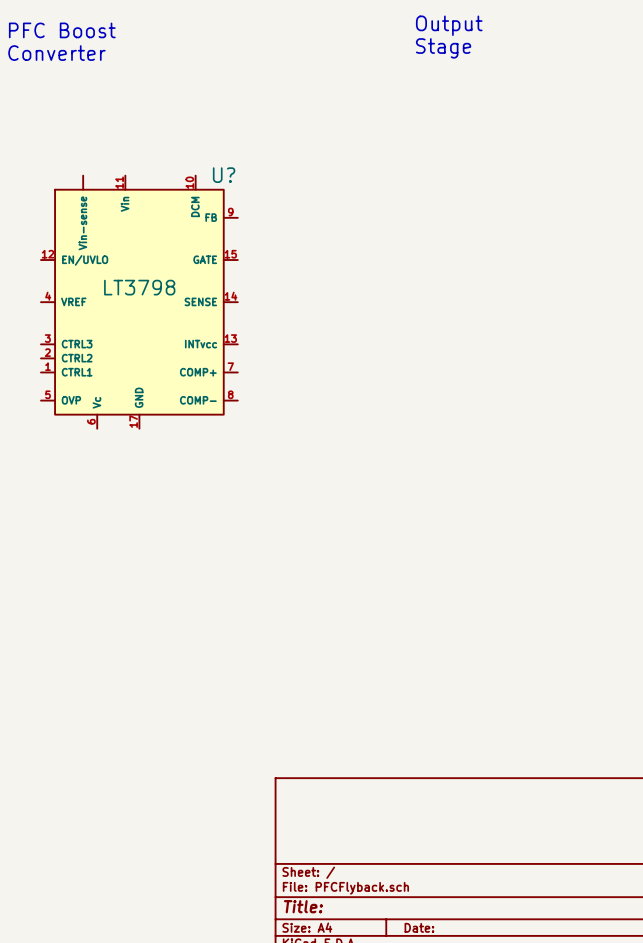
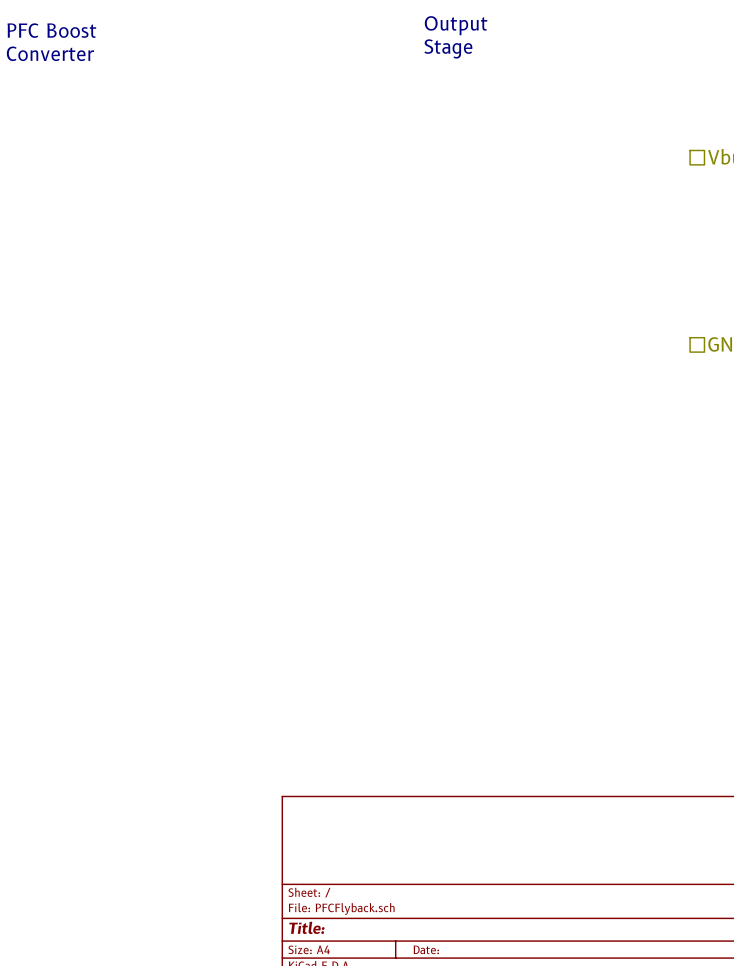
U?: LT3798 (139, 302) -> none

